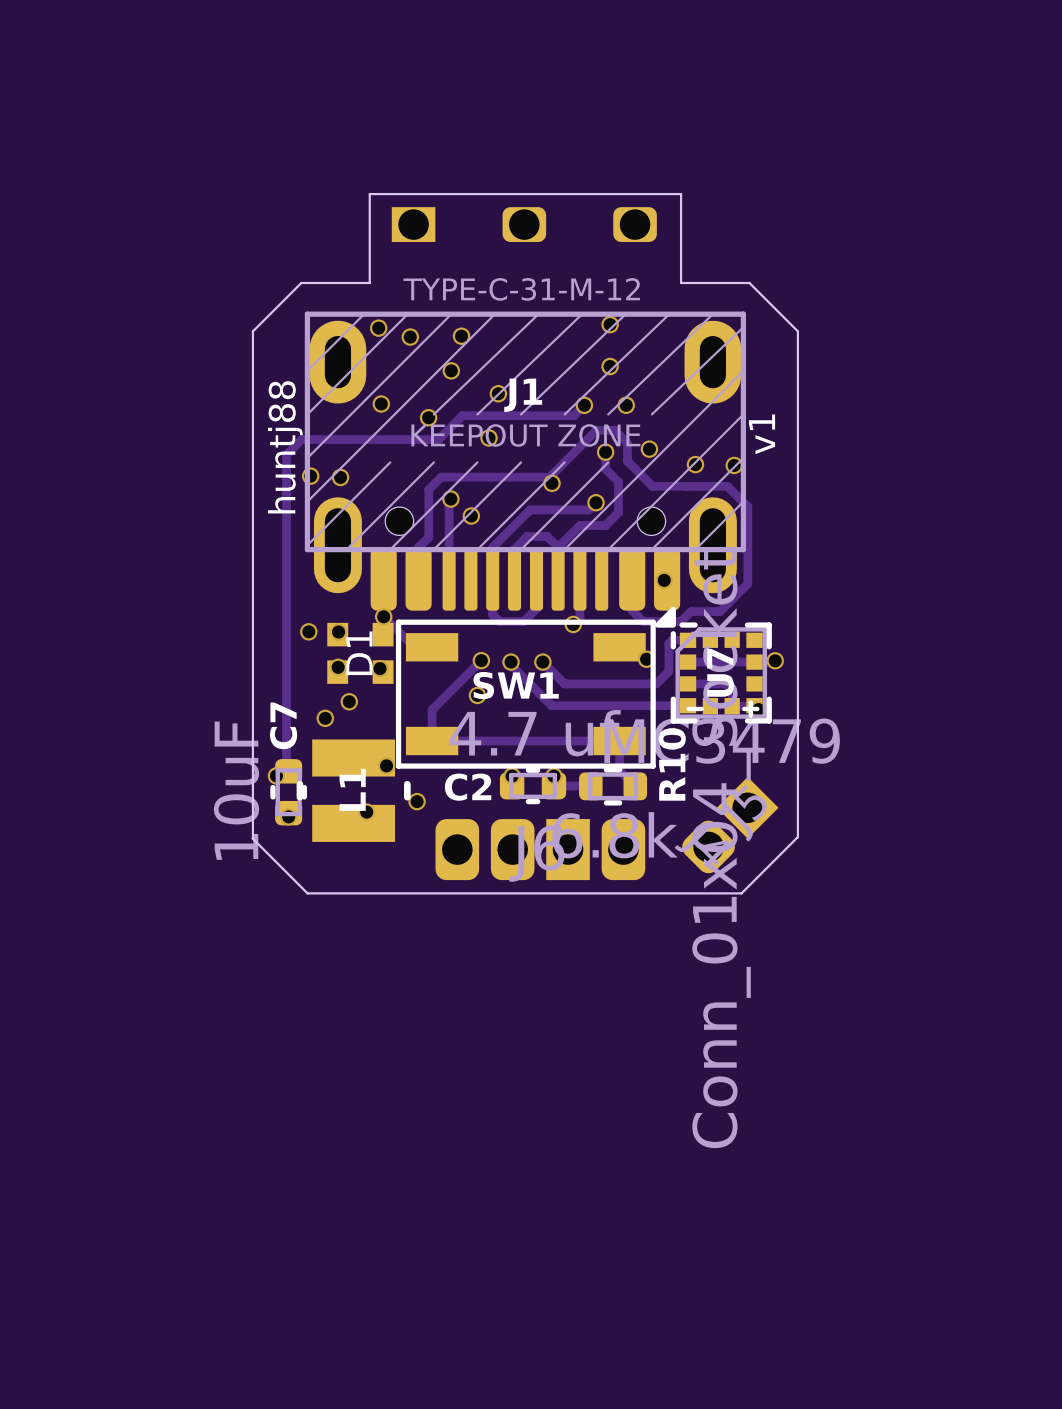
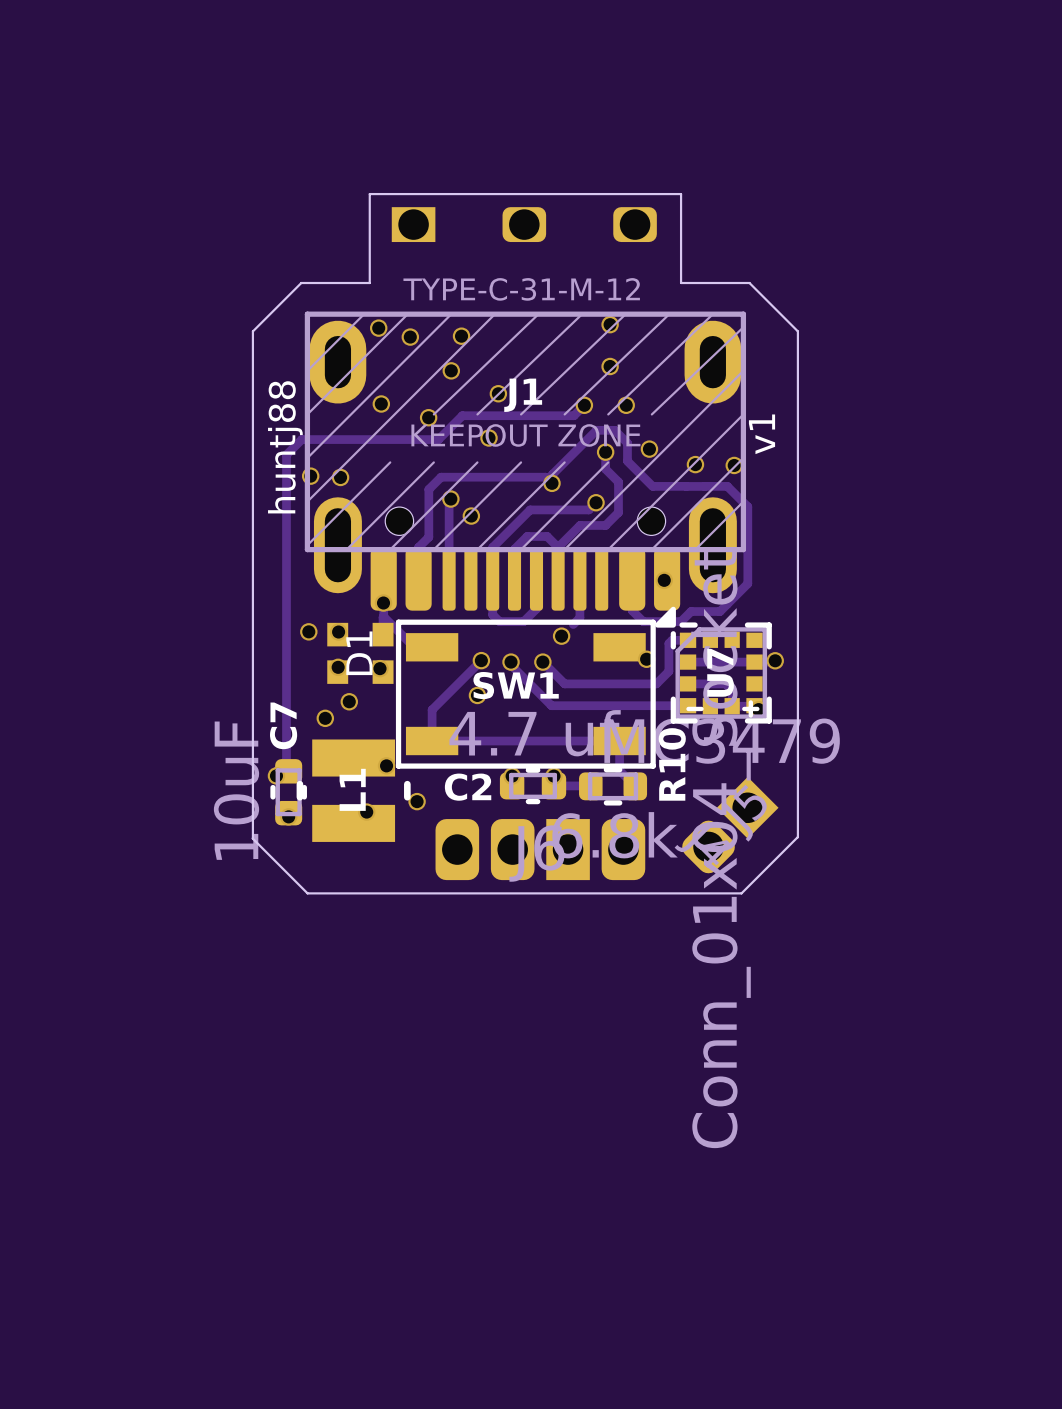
via position: (383, 616) -> (383, 603)
via position: (573, 624) -> (561, 636)

